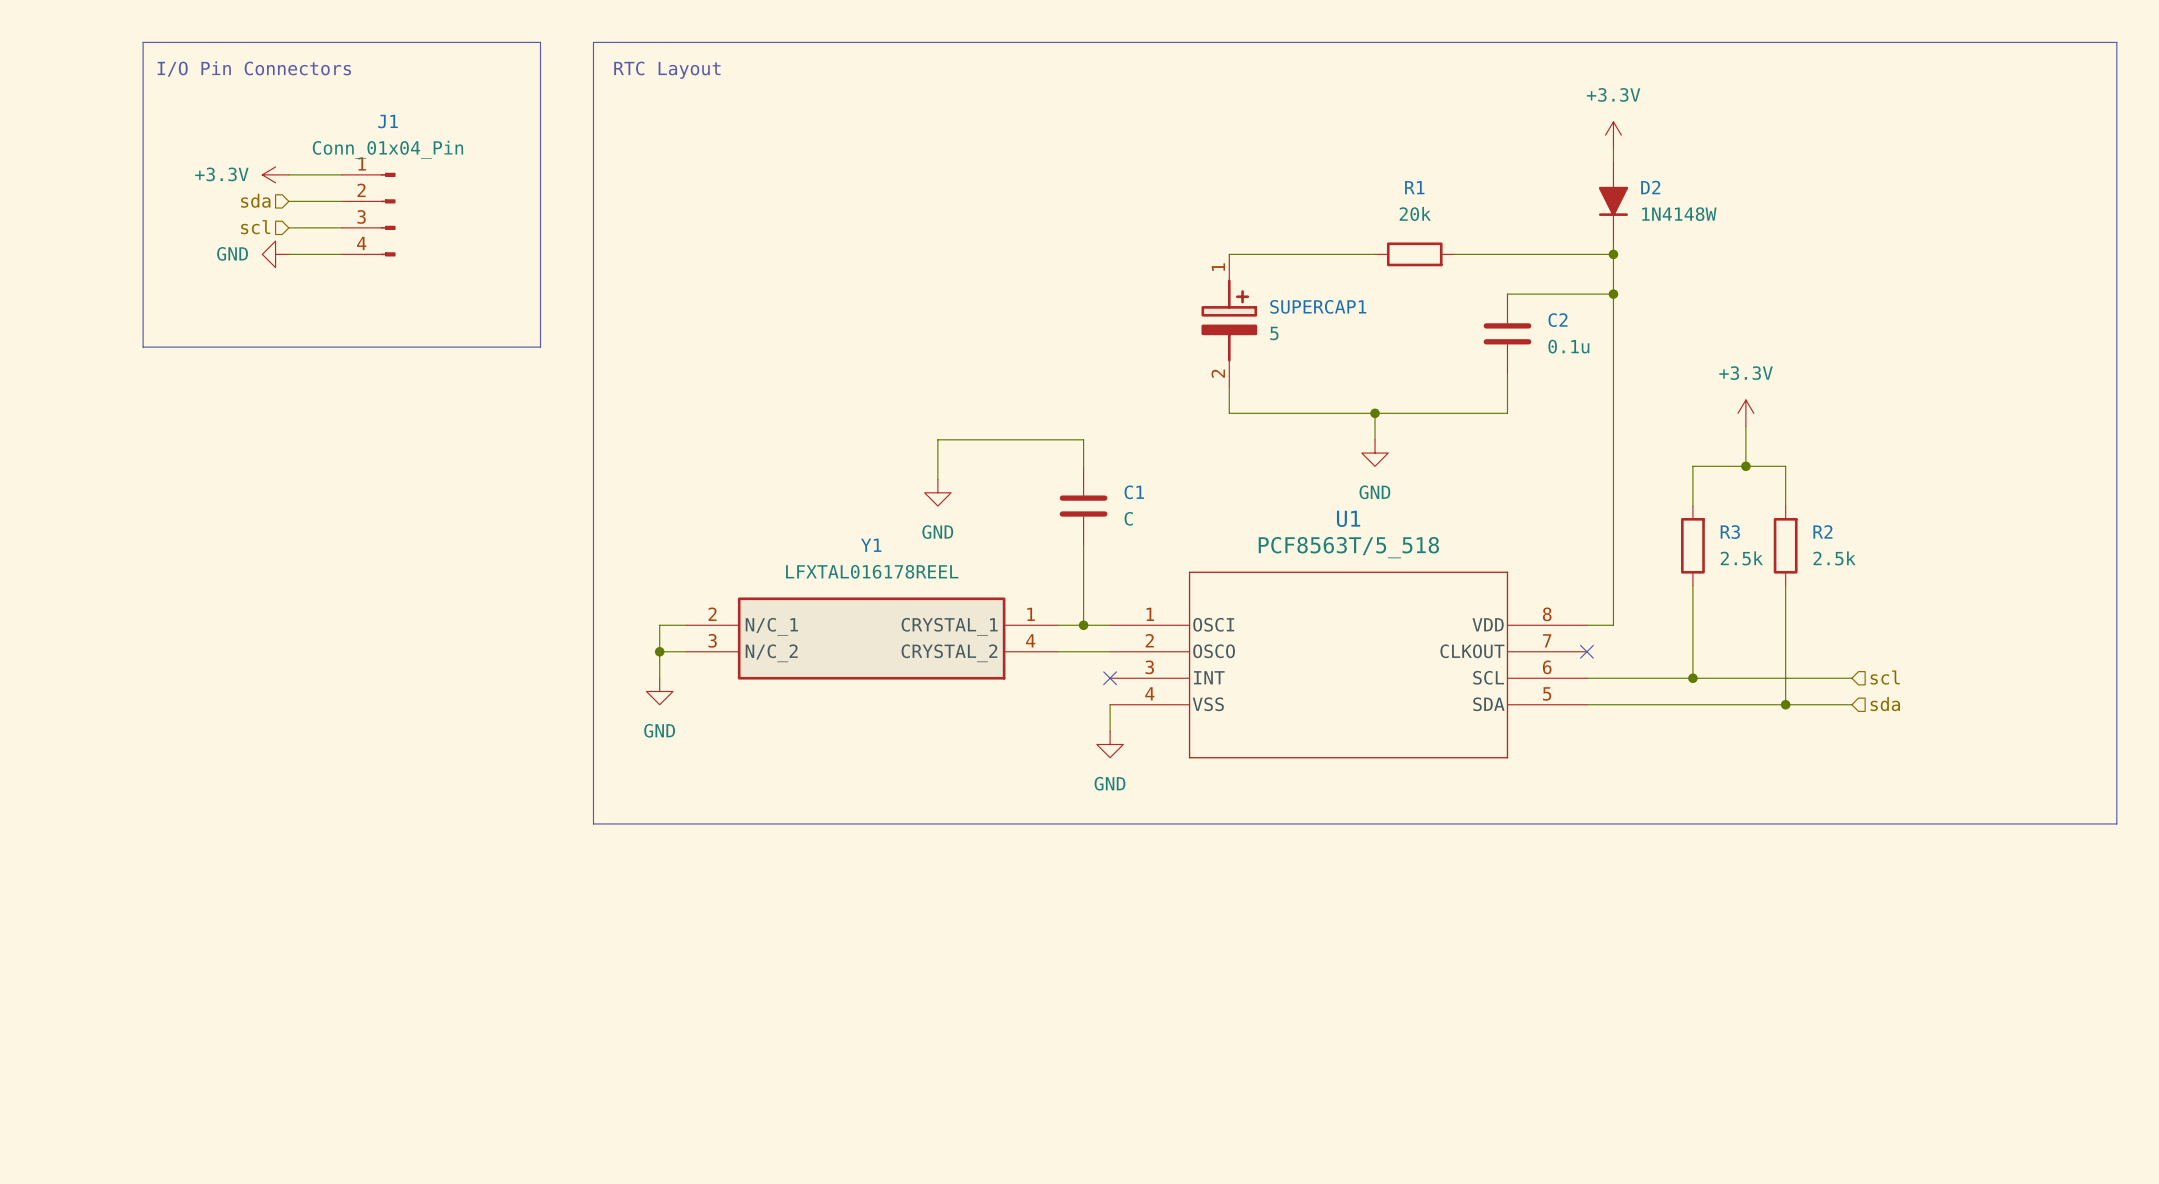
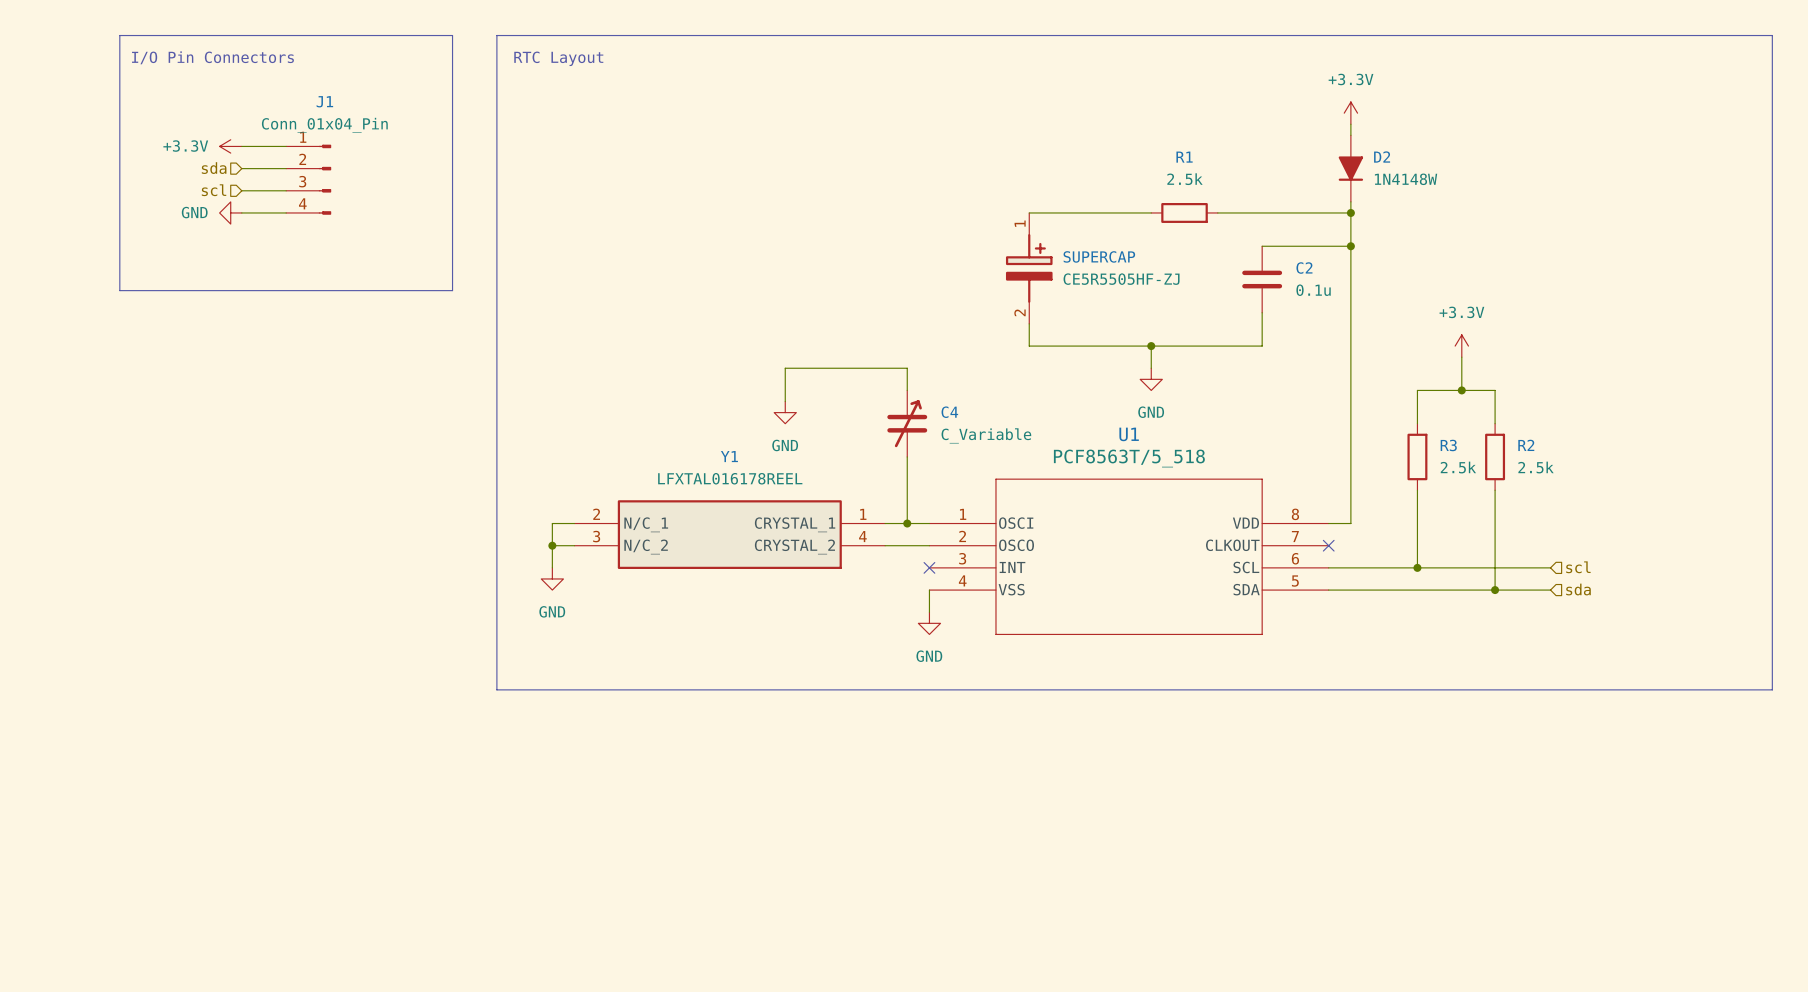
R1 value: 20k (1415, 213) -> 2.5k (1184, 179)
SUPERCAP1 name: SUPERCAP1 (1318, 306) -> SUPERCAP (1099, 256)
SUPERCAP1 value: 5 (1274, 333) -> CE5R5505HF-ZJ (1121, 279)
C1: C (1083, 506) -> none
C4: none -> C_Variable (907, 423)

